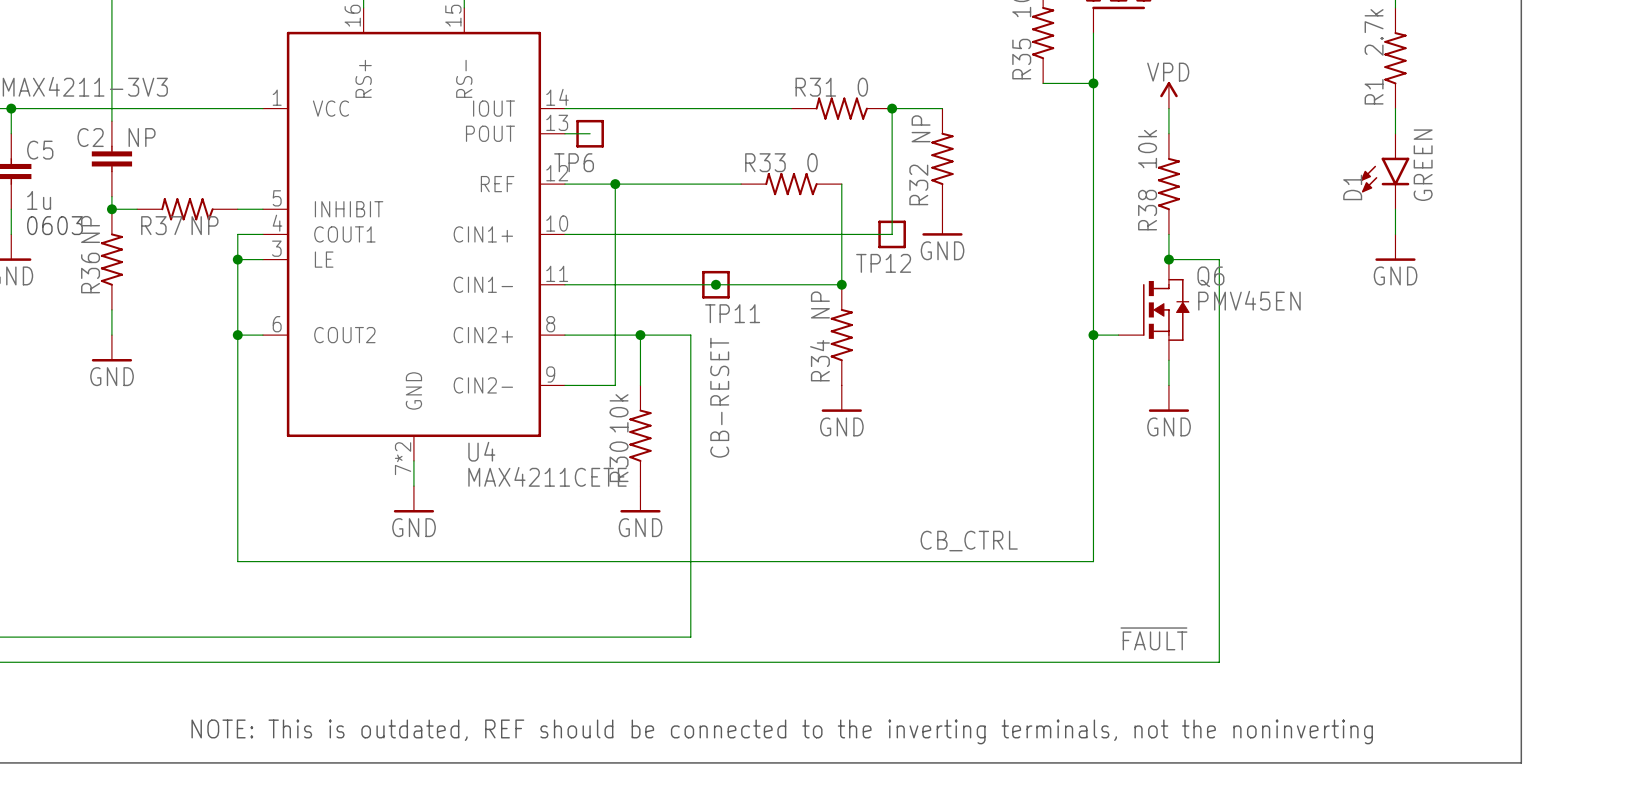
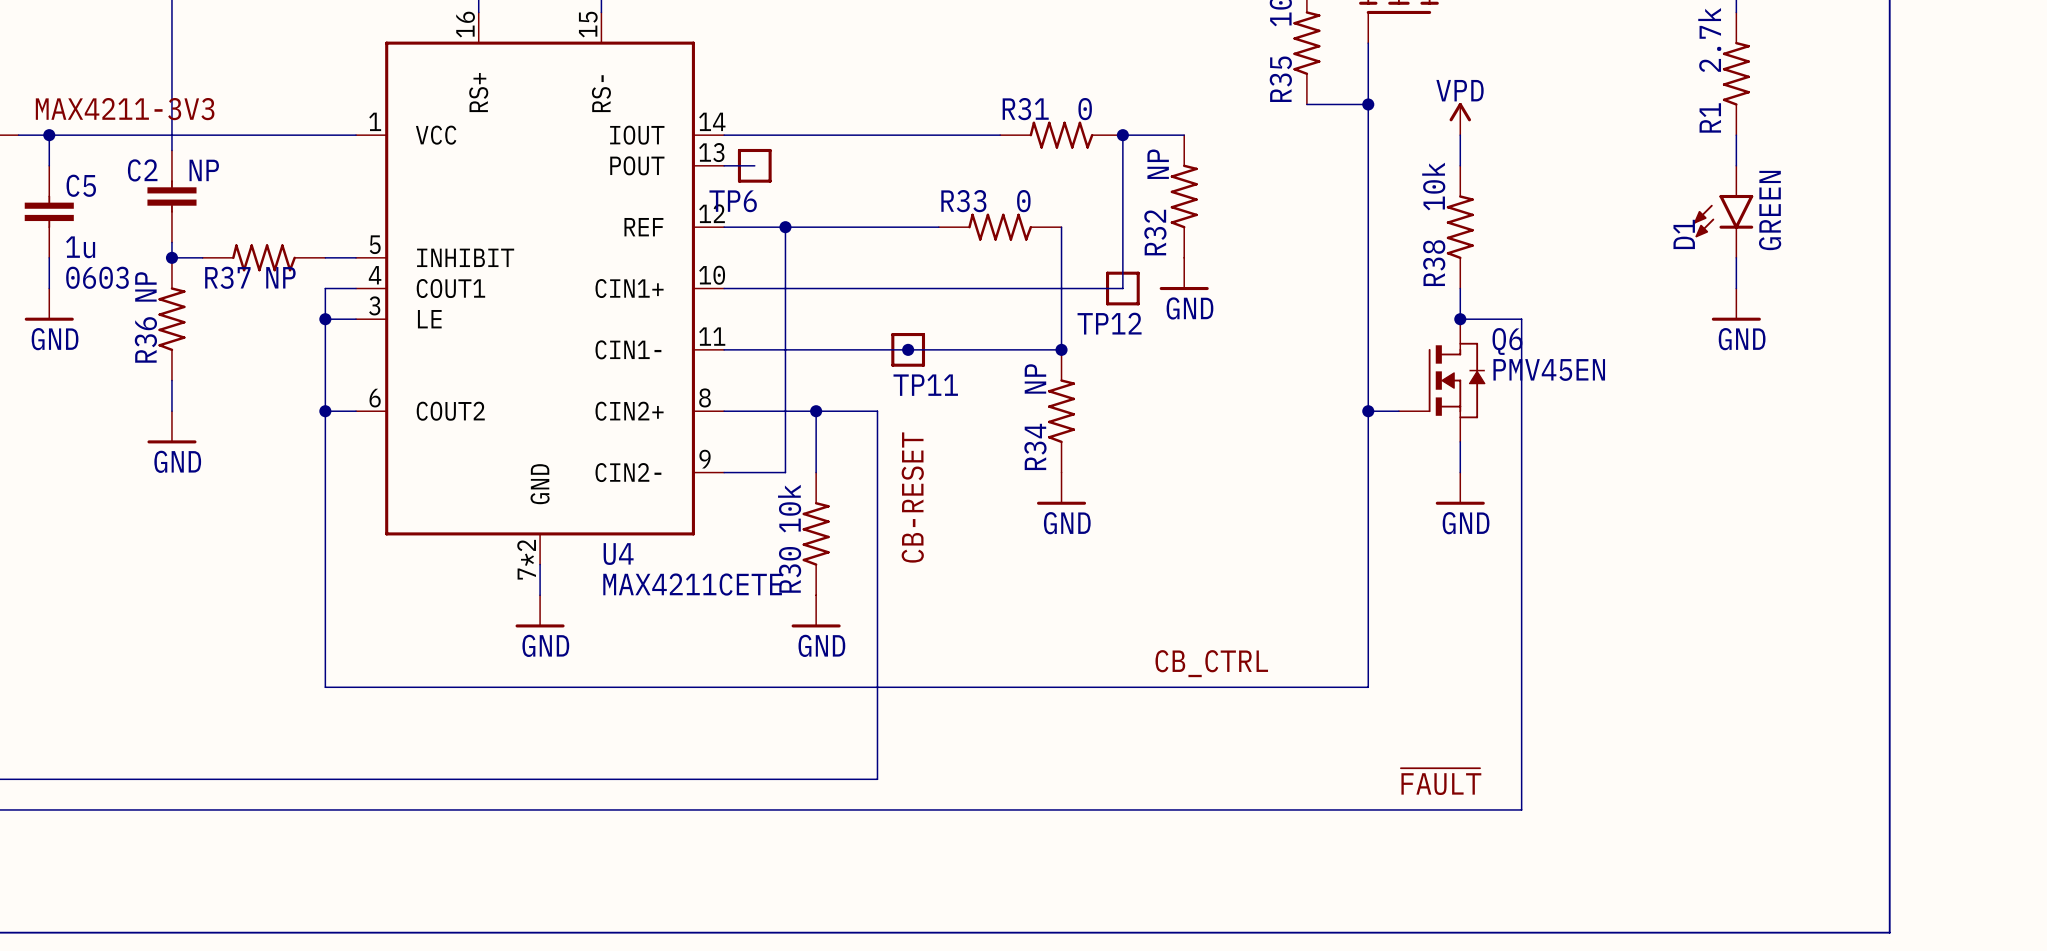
text: NOTE: This is outdated, REF should be connected to the inverting terminals, not the noninverting (782, 731) -> none

